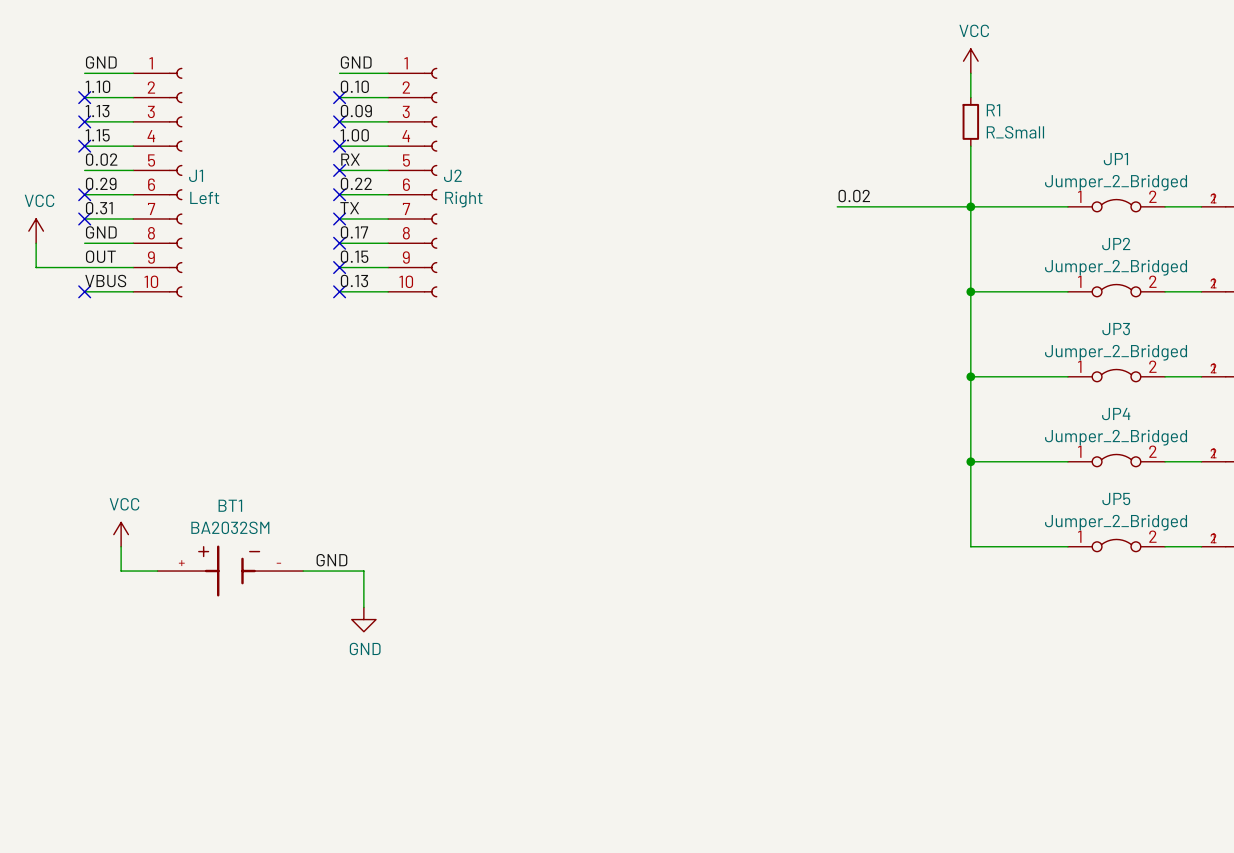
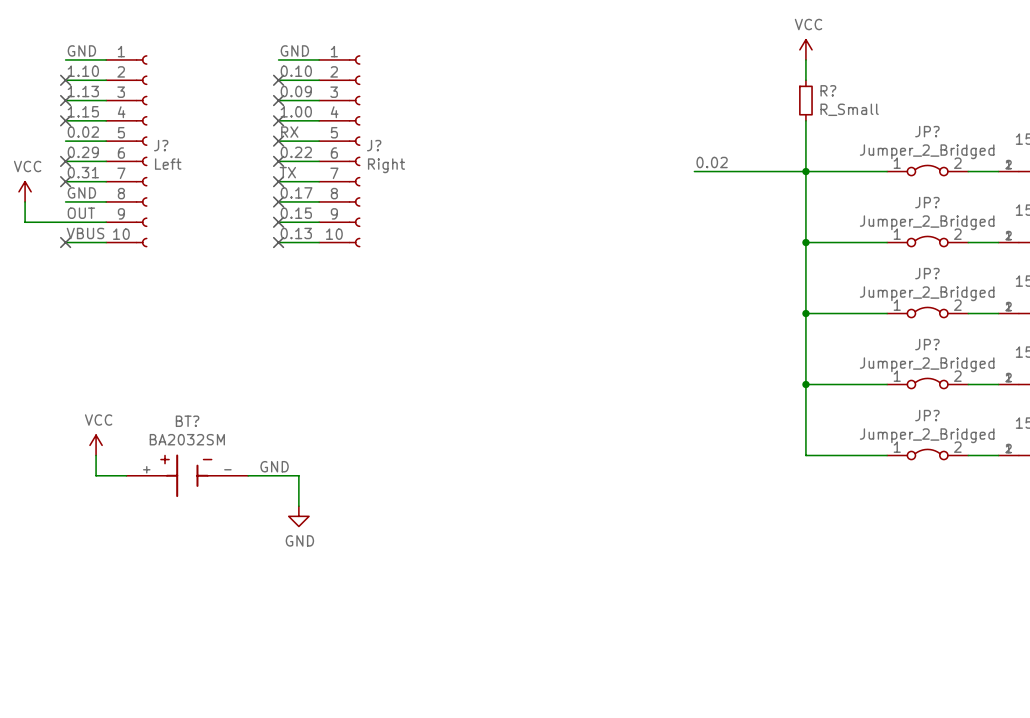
R1 name: R1 (993, 110) -> R? (828, 90)
JP1 name: JP1 (1115, 159) -> JP? (927, 131)
J1 name: J1 (196, 175) -> J? (161, 145)
J2 name: J2 (452, 175) -> J? (374, 145)
JP2 name: JP2 (1116, 244) -> JP? (927, 202)
JP3 name: JP3 (1116, 329) -> JP? (927, 273)
JP4 name: JP4 (1116, 414) -> JP? (927, 344)
JP5 name: JP5 (1116, 499) -> JP? (927, 415)
BT1 name: BT1 (230, 505) -> BT? (187, 421)

